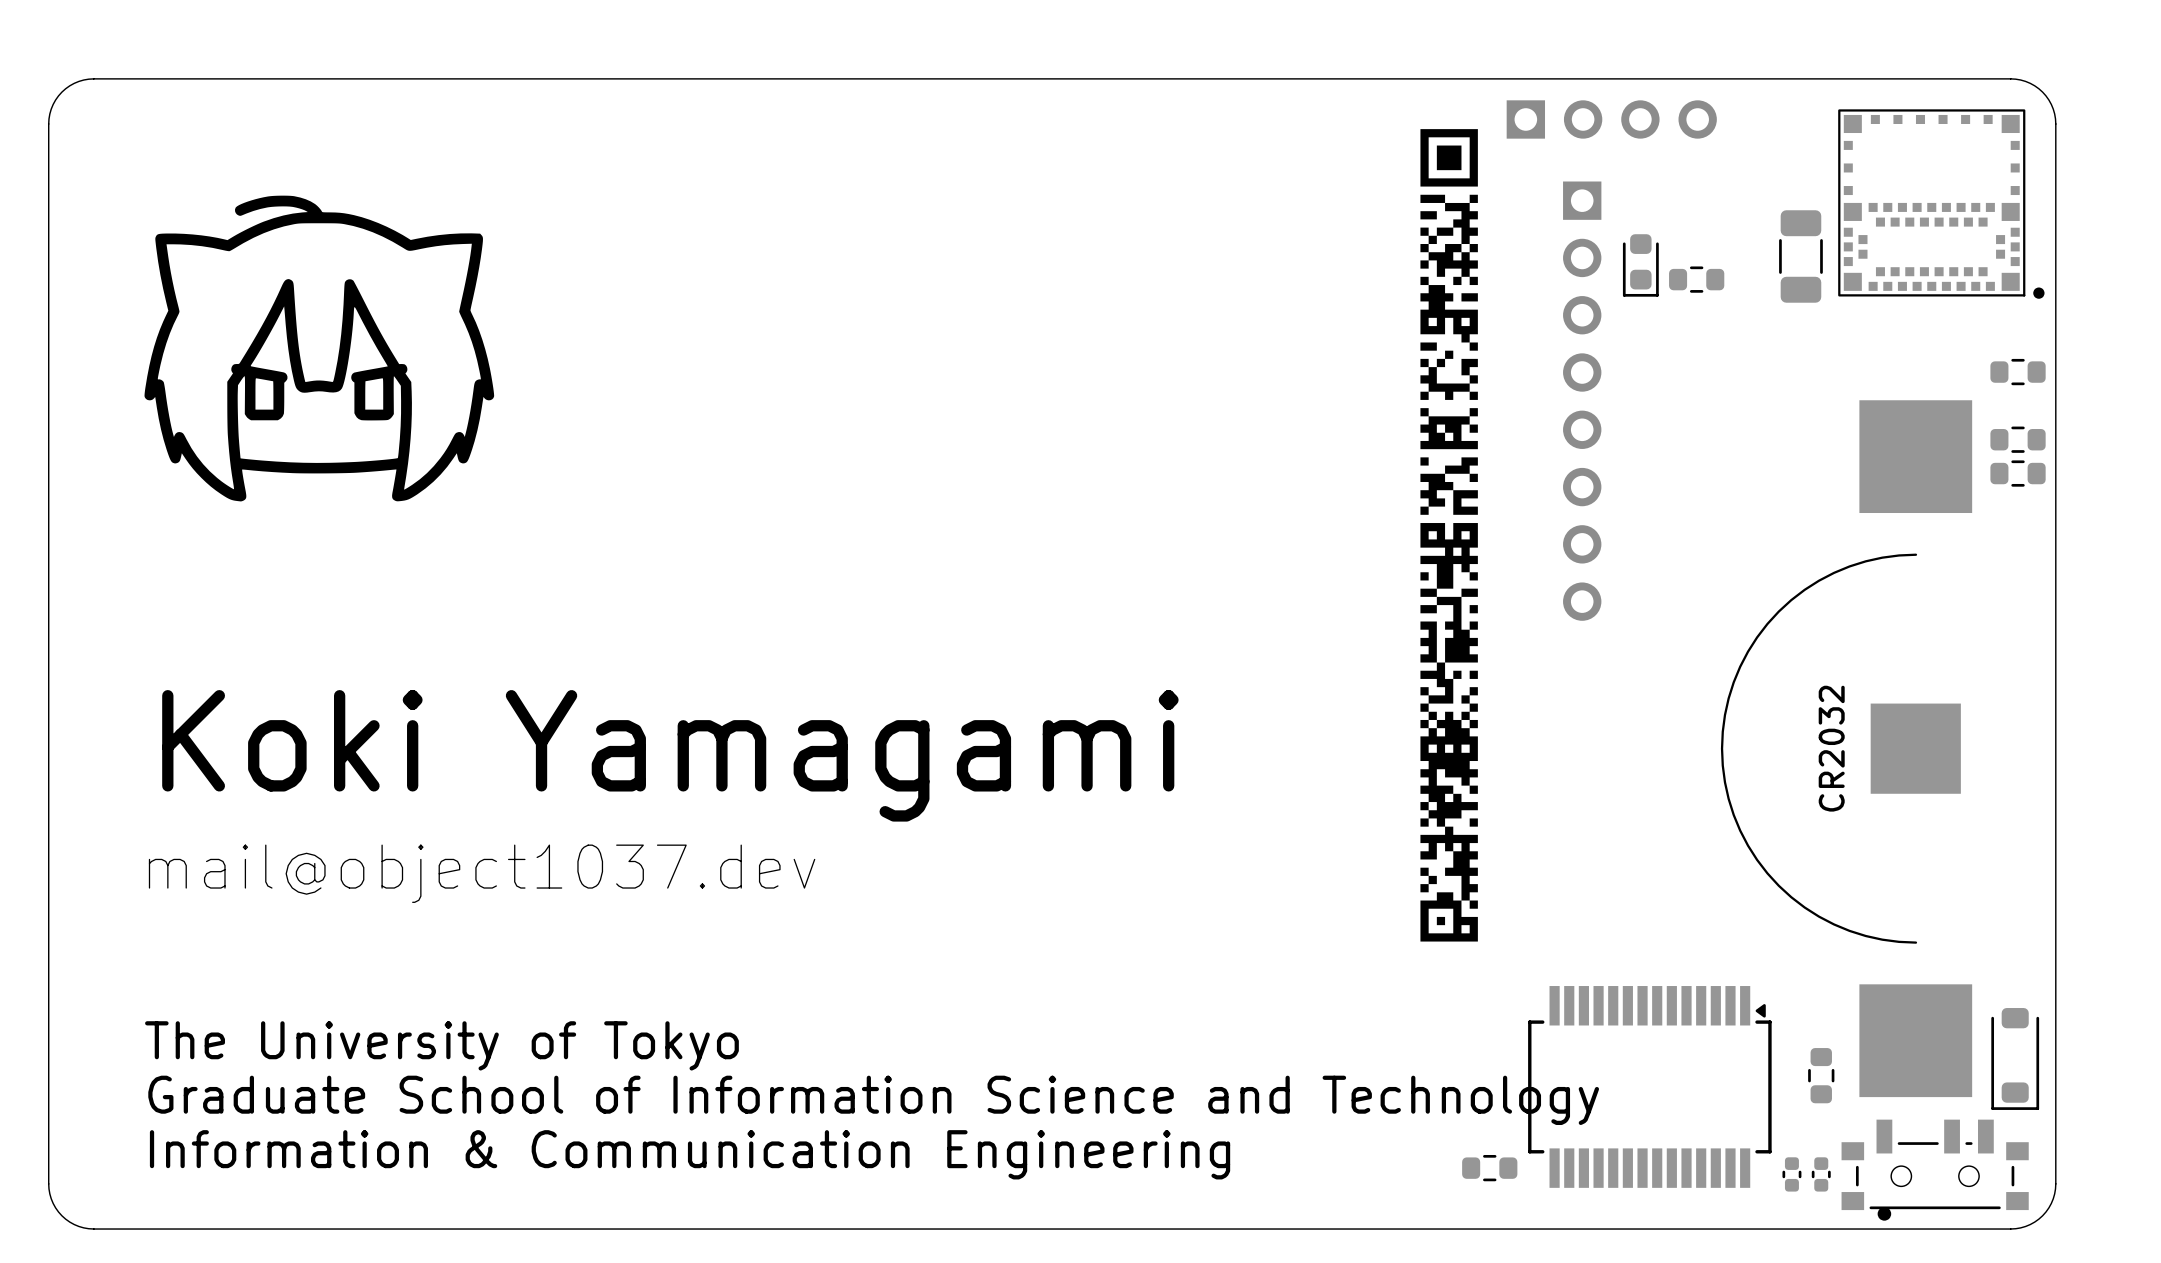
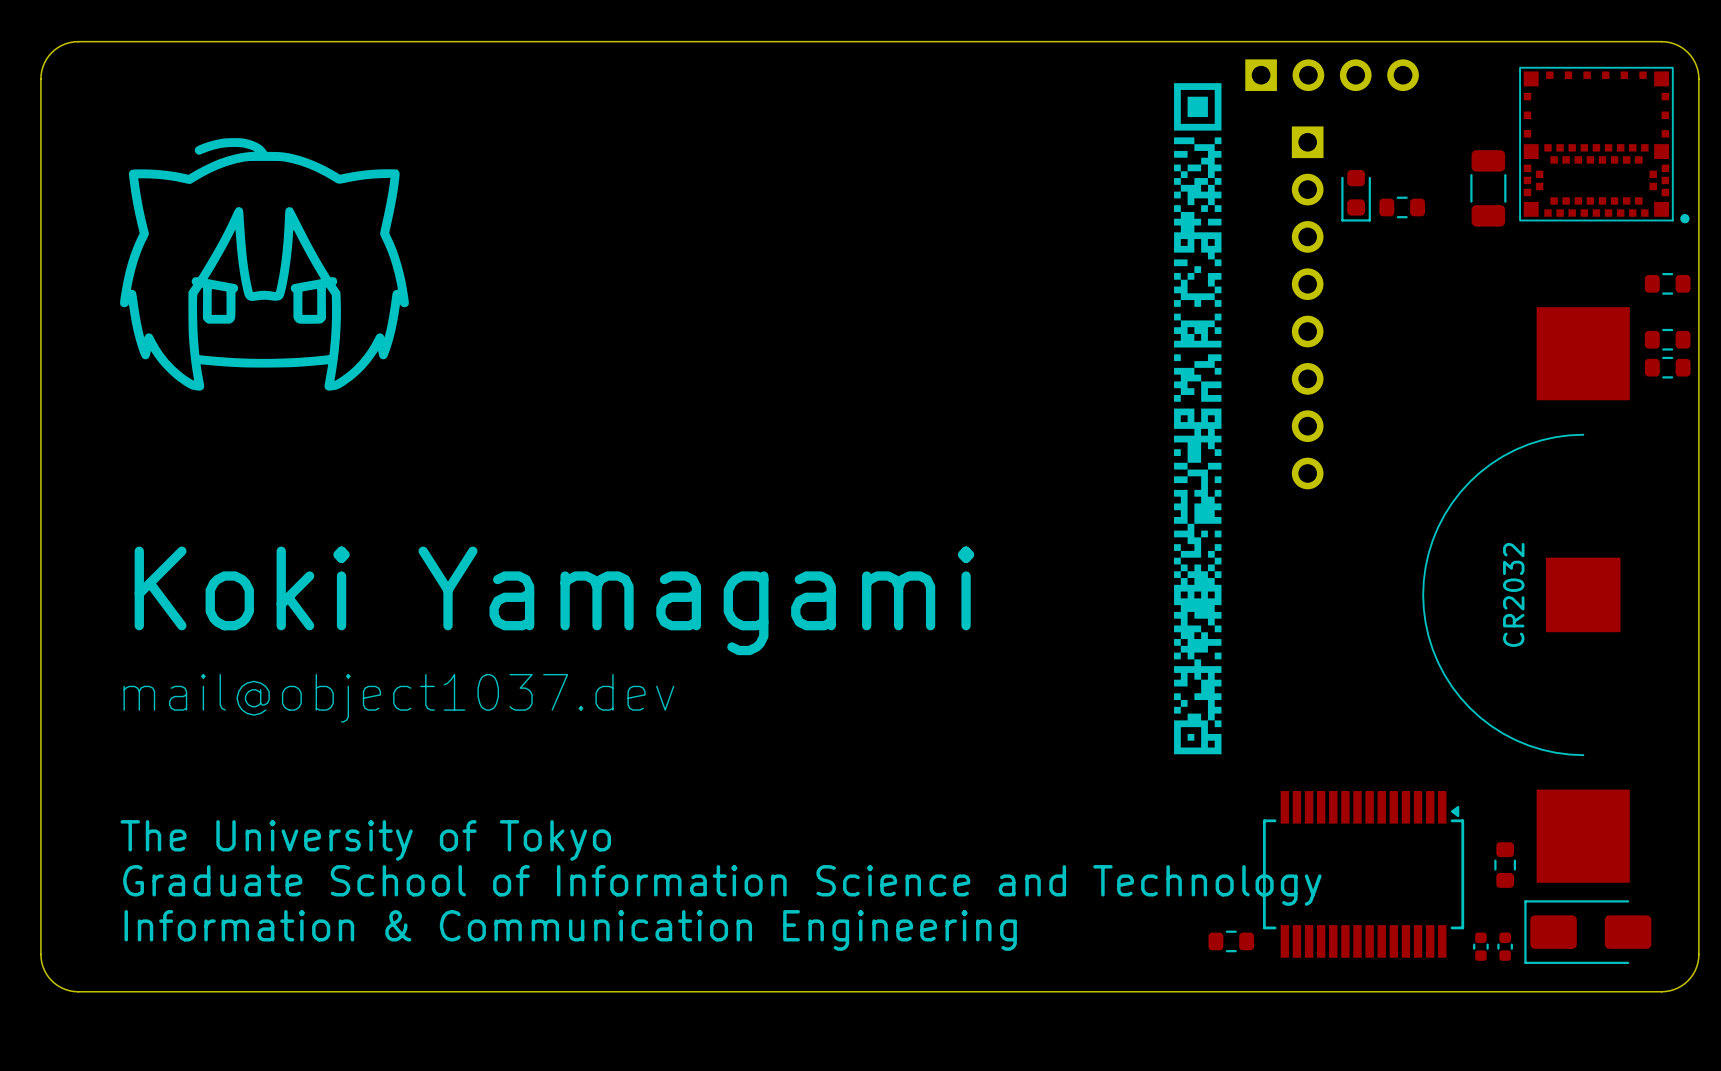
part: (2015, 1058) -> none
part footprint: [1841, 1119, 2029, 1221] -> [1524, 900, 1652, 964]

